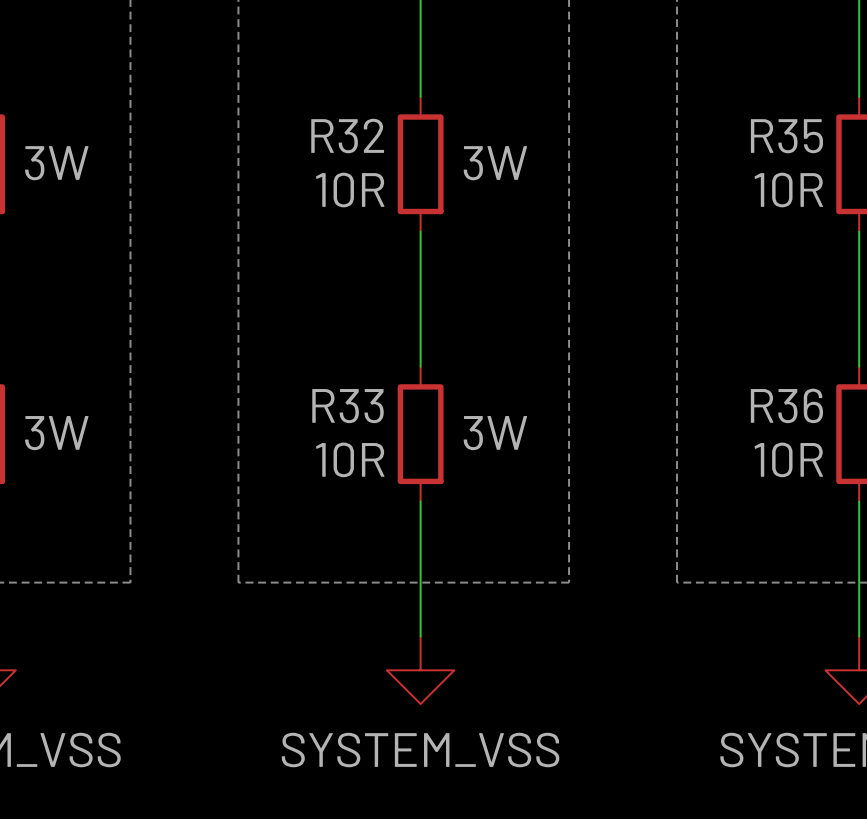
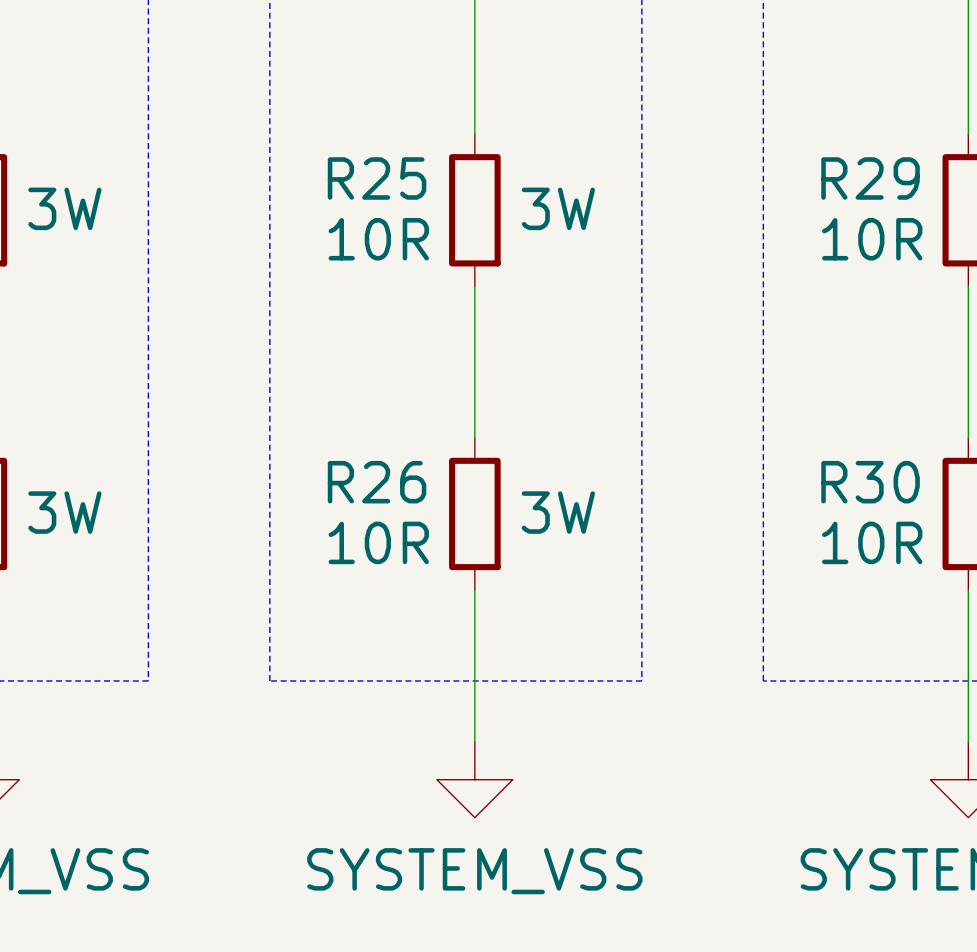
R32 name: R32 (347, 136) -> R25 (377, 178)
R35 name: R35 (786, 136) -> R29 (870, 178)
R36 name: R36 (786, 405) -> R30 (870, 482)
R33 name: R33 (348, 406) -> R26 (377, 482)

